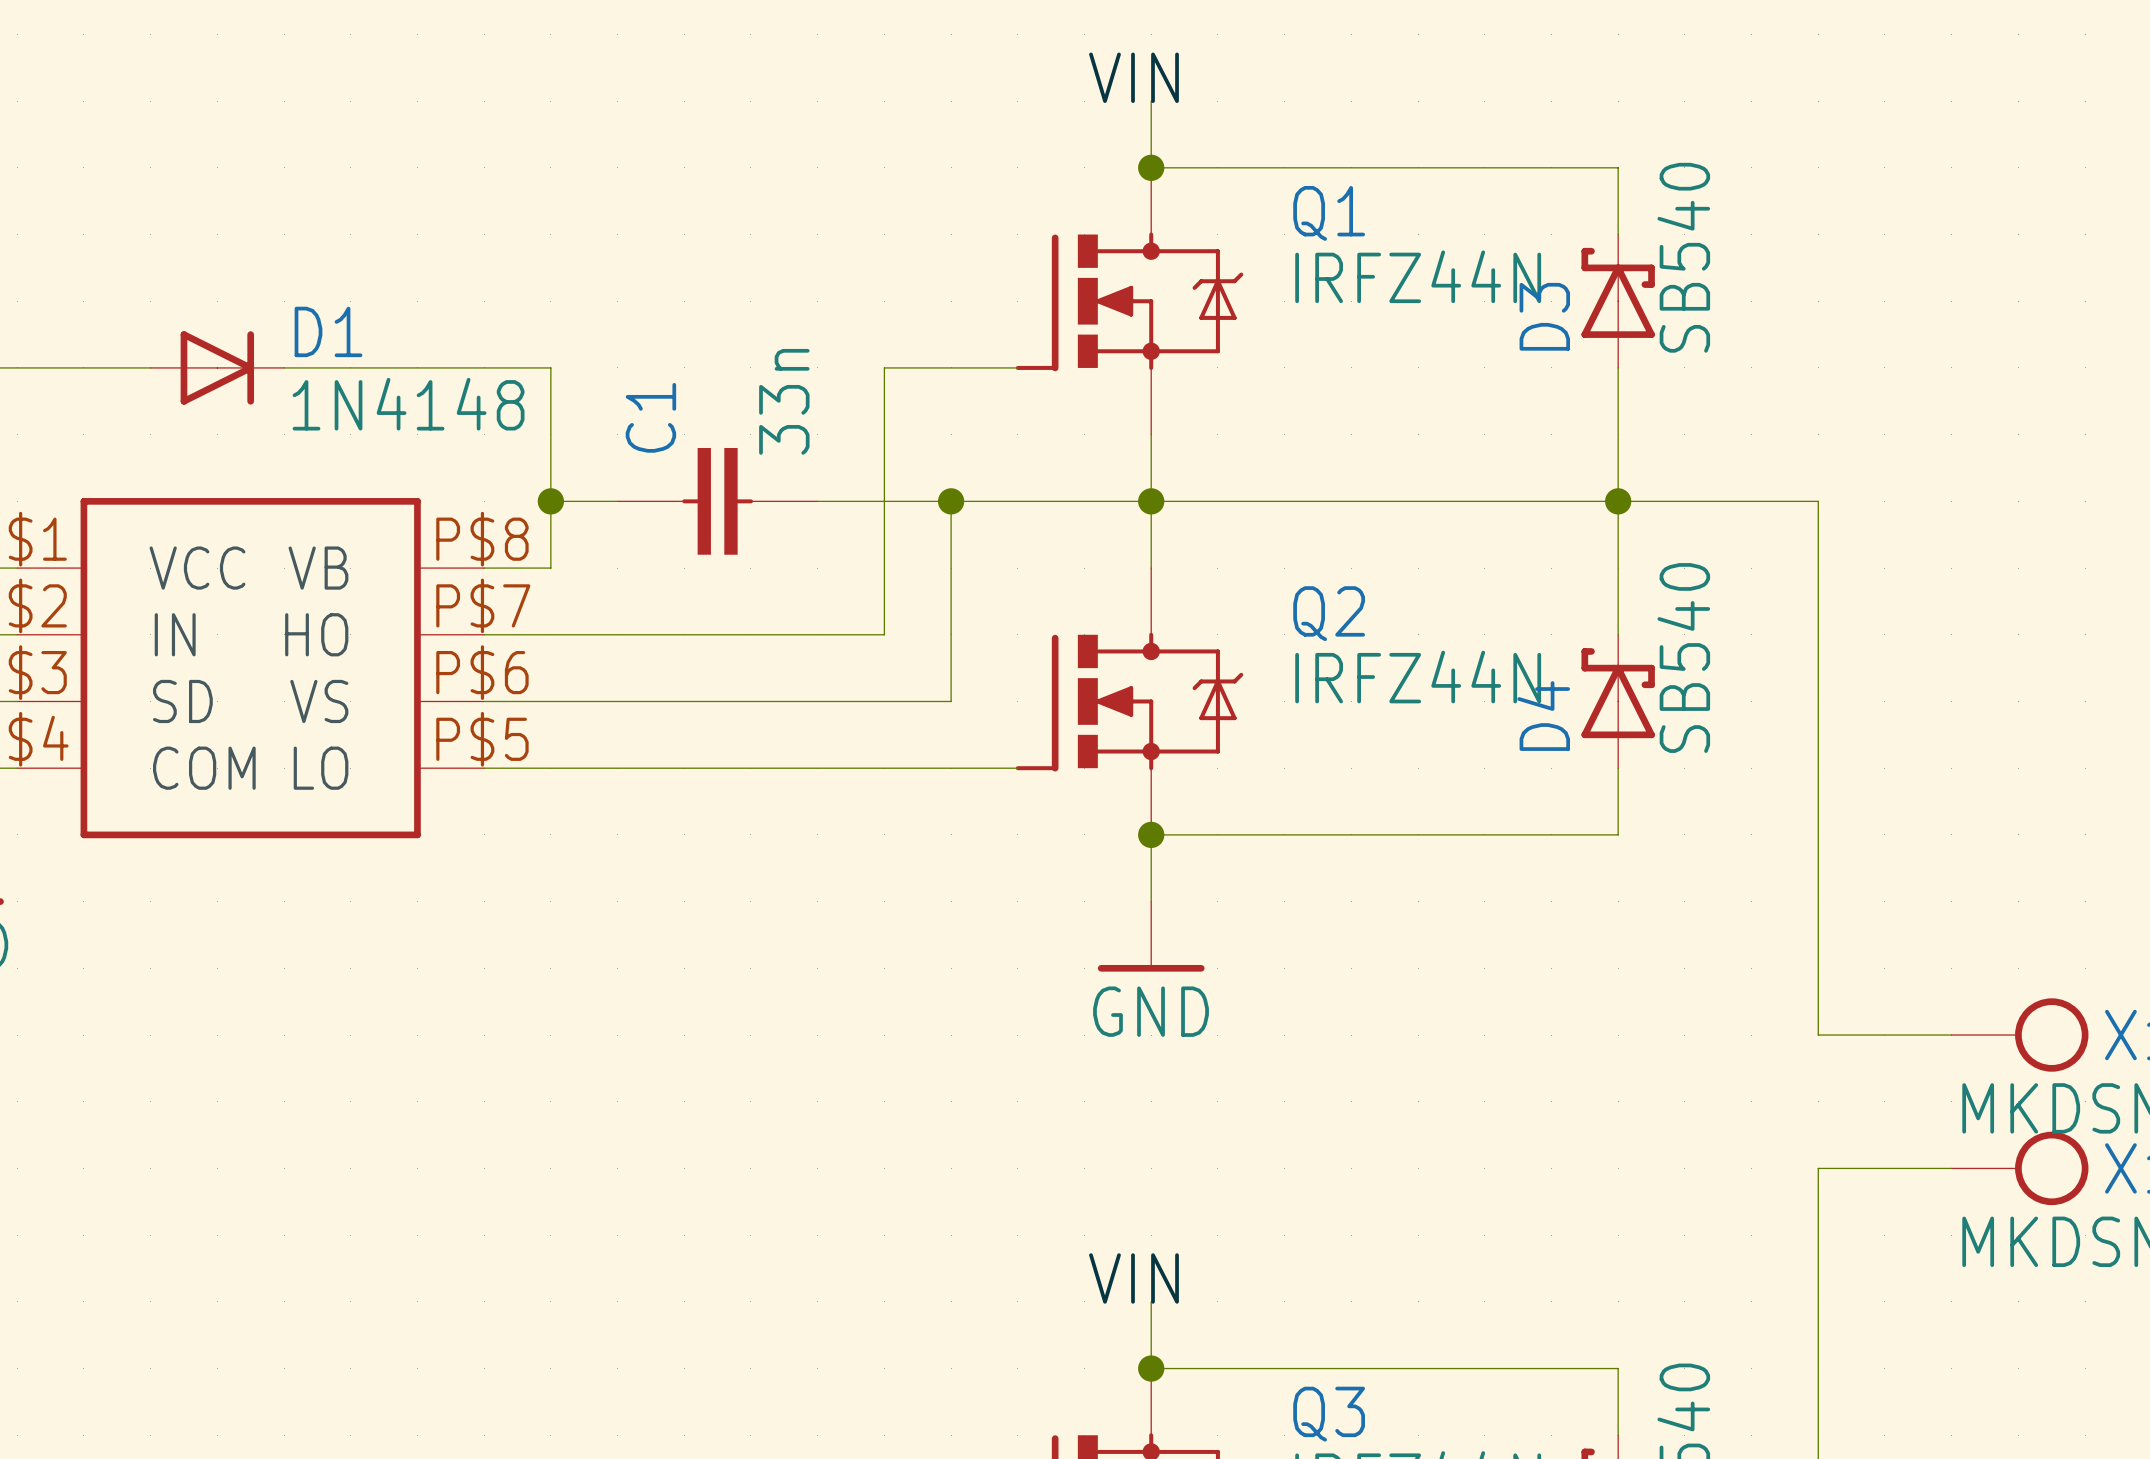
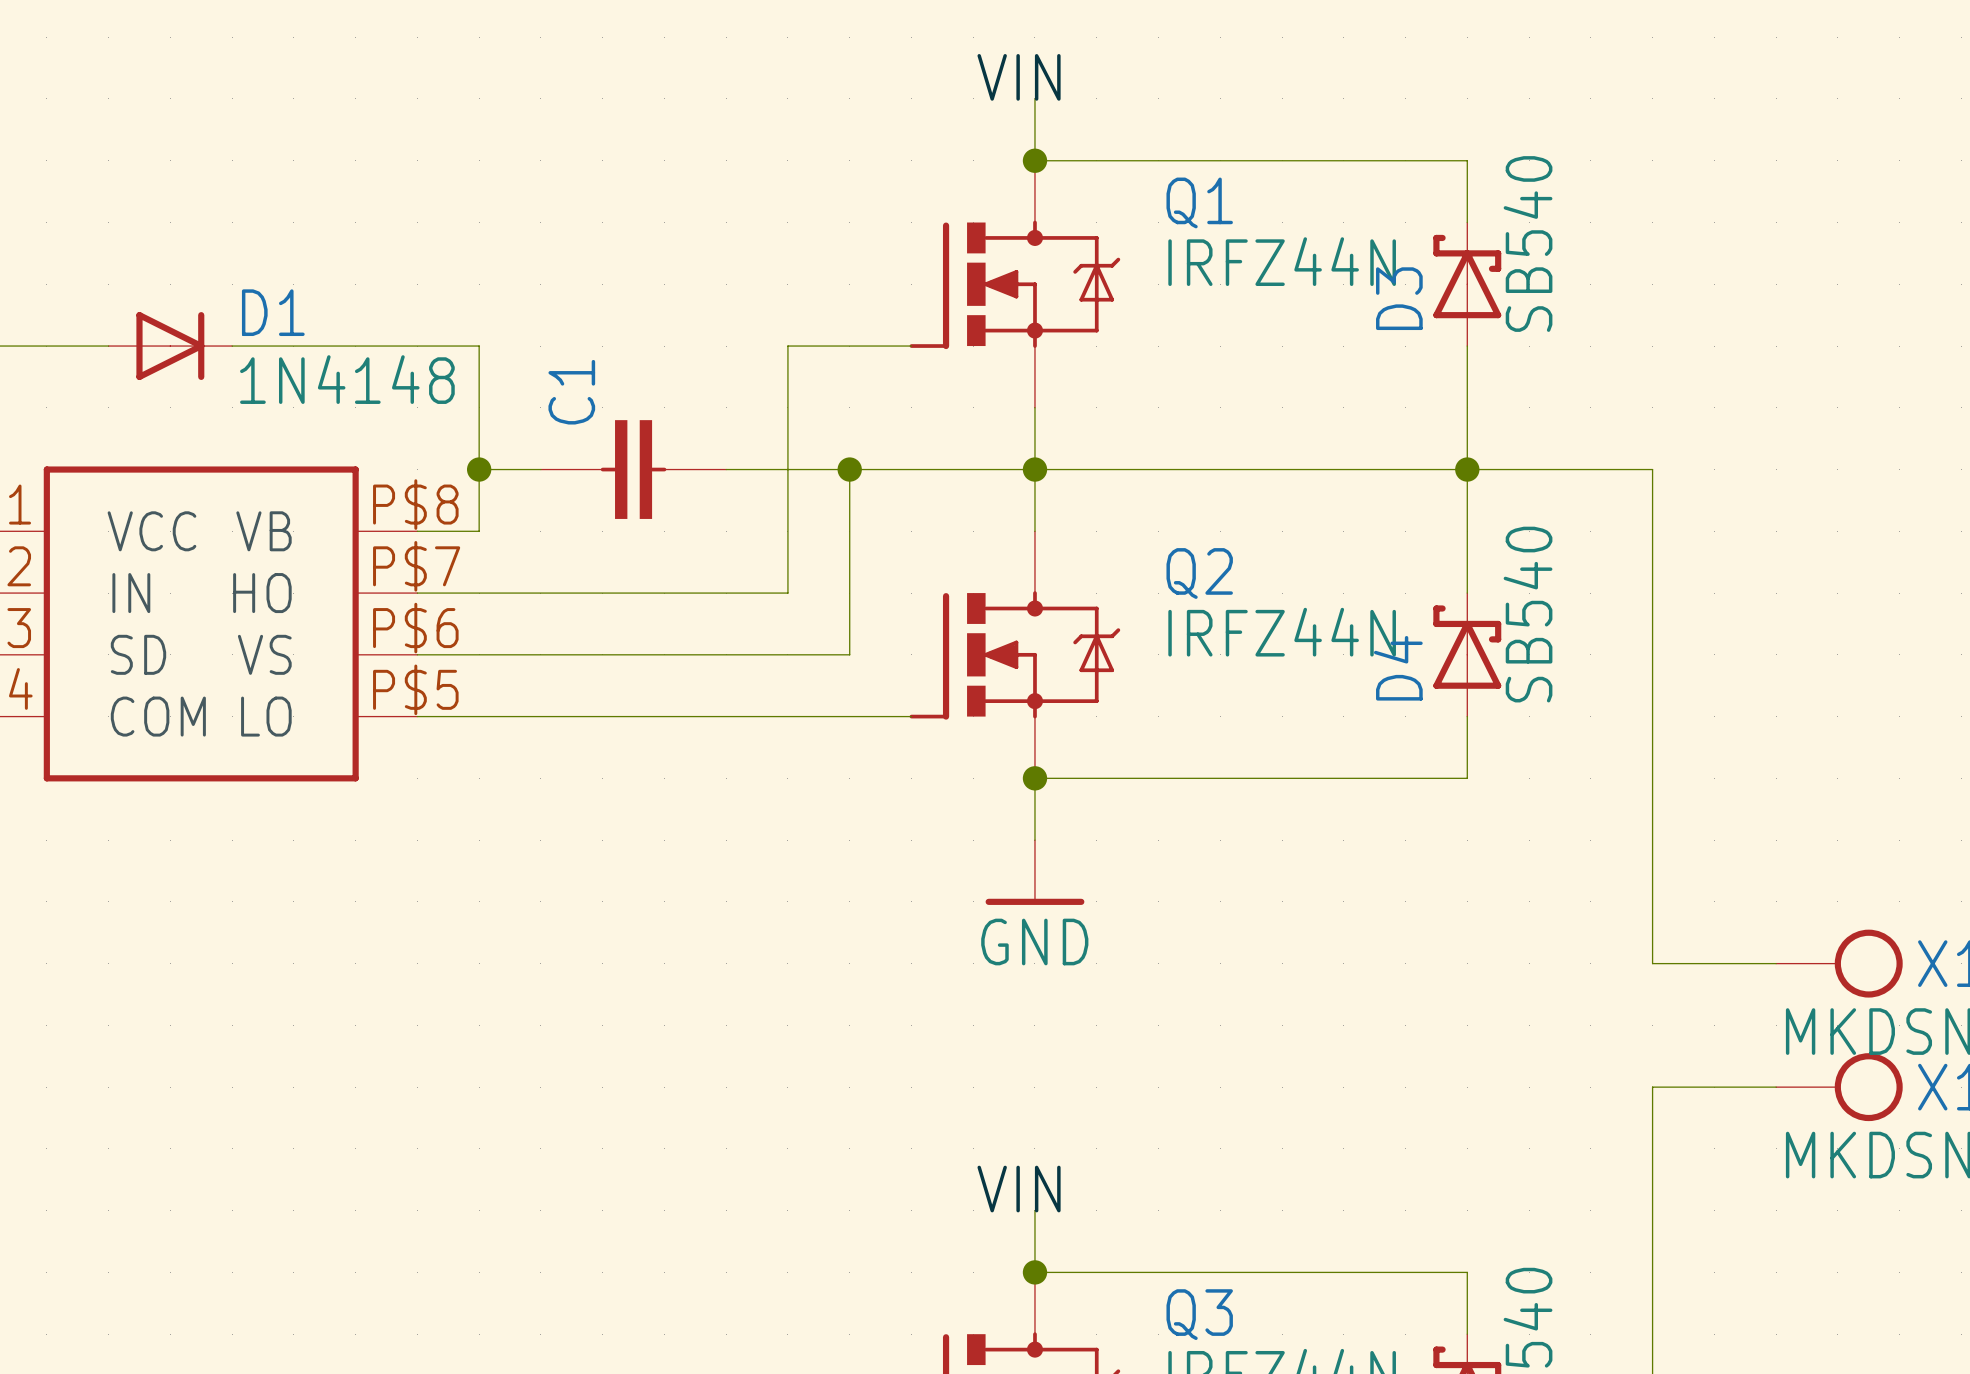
C1 value: 33n (784, 401) -> none

